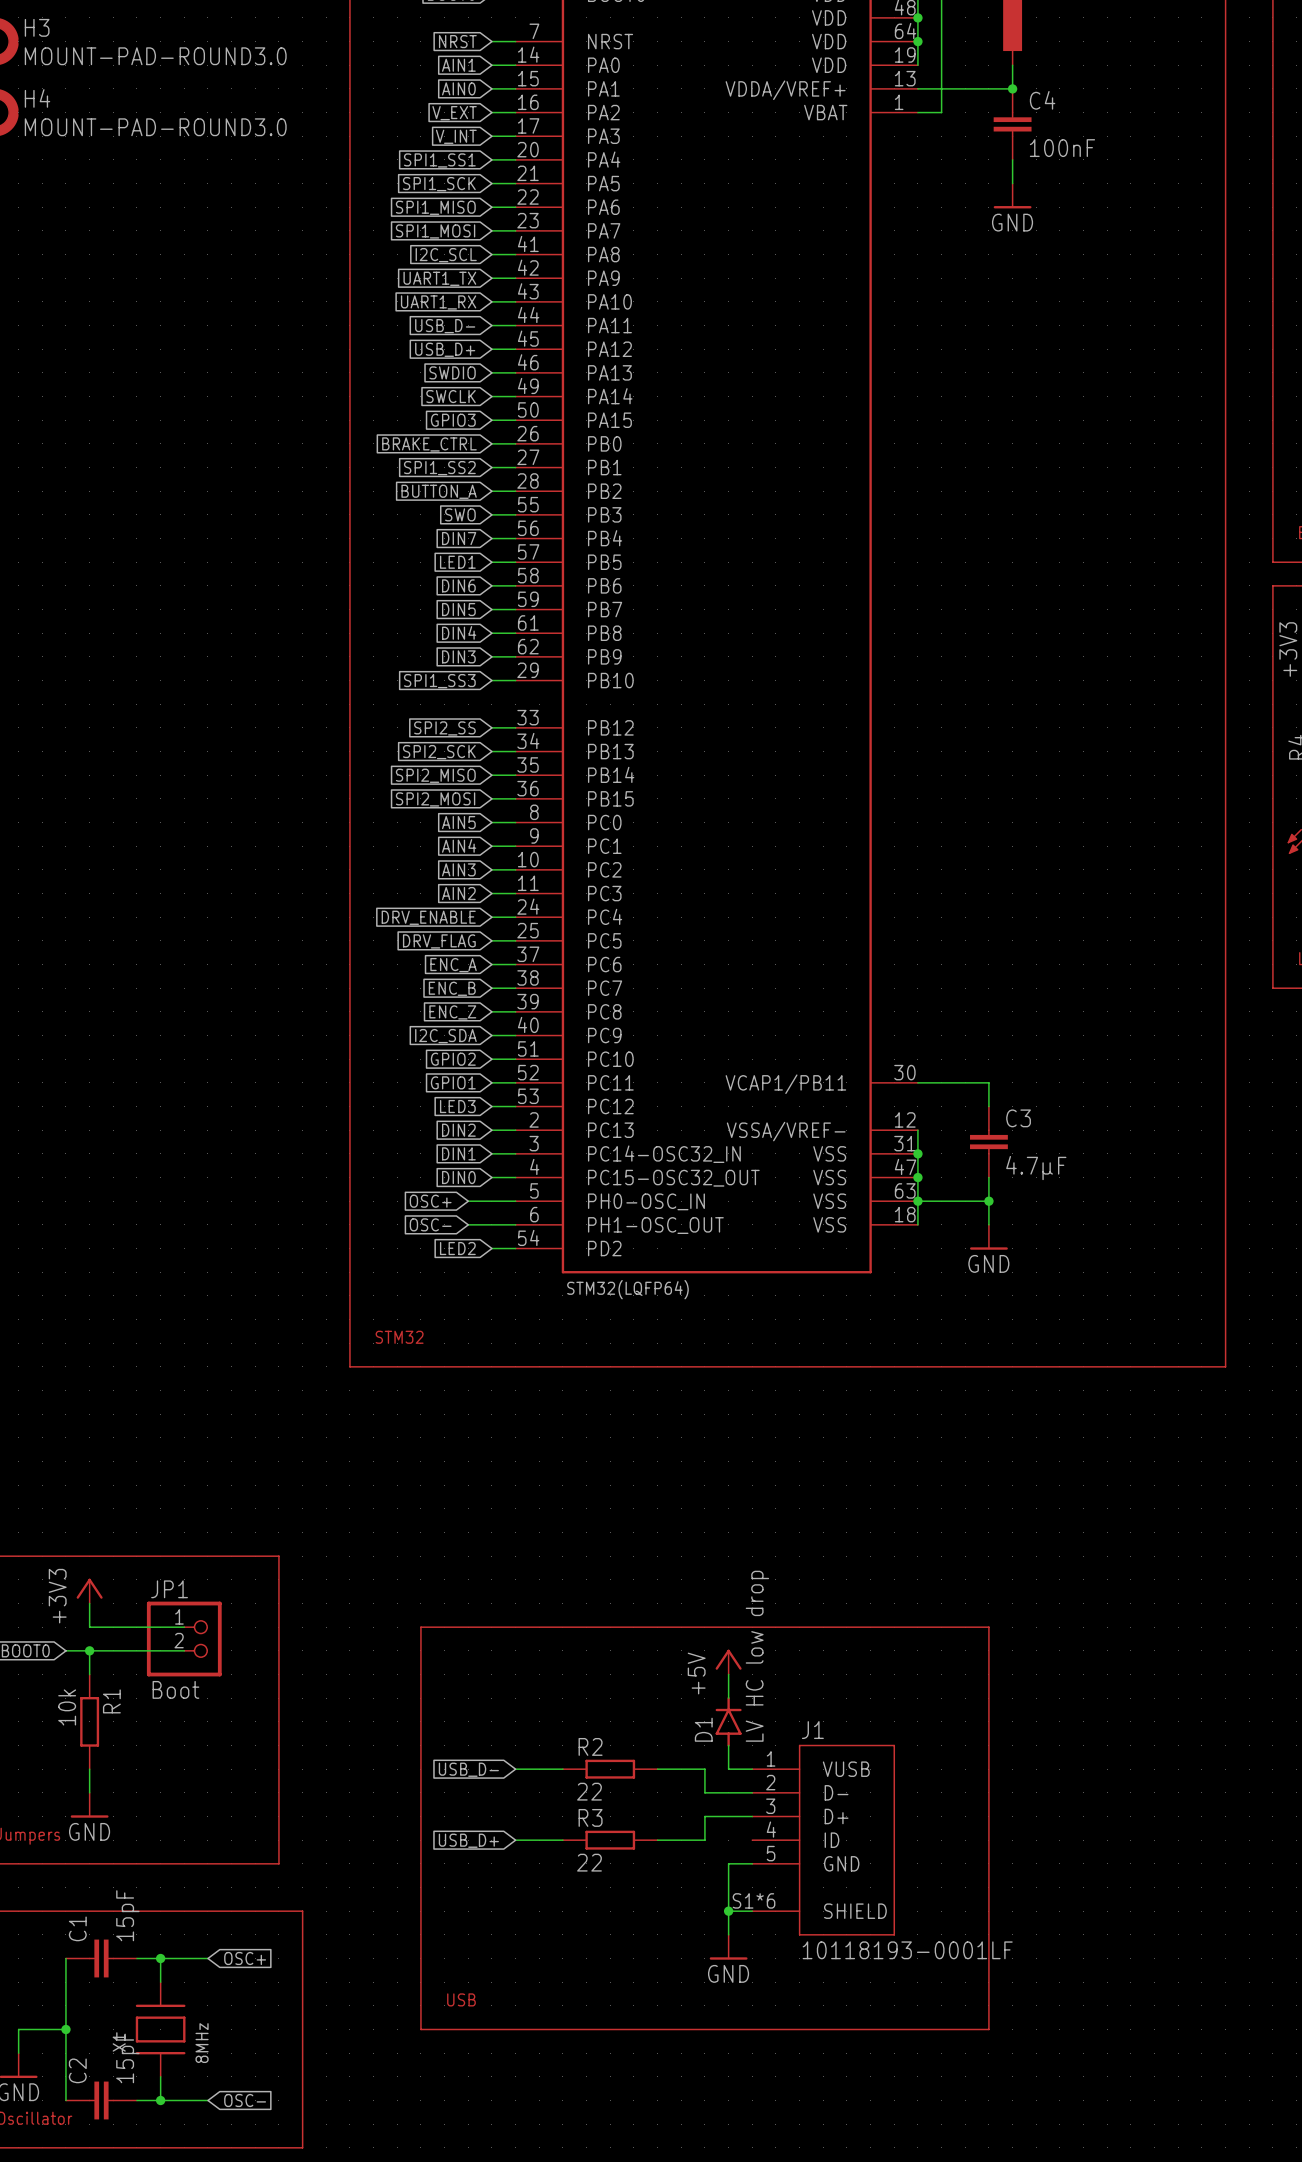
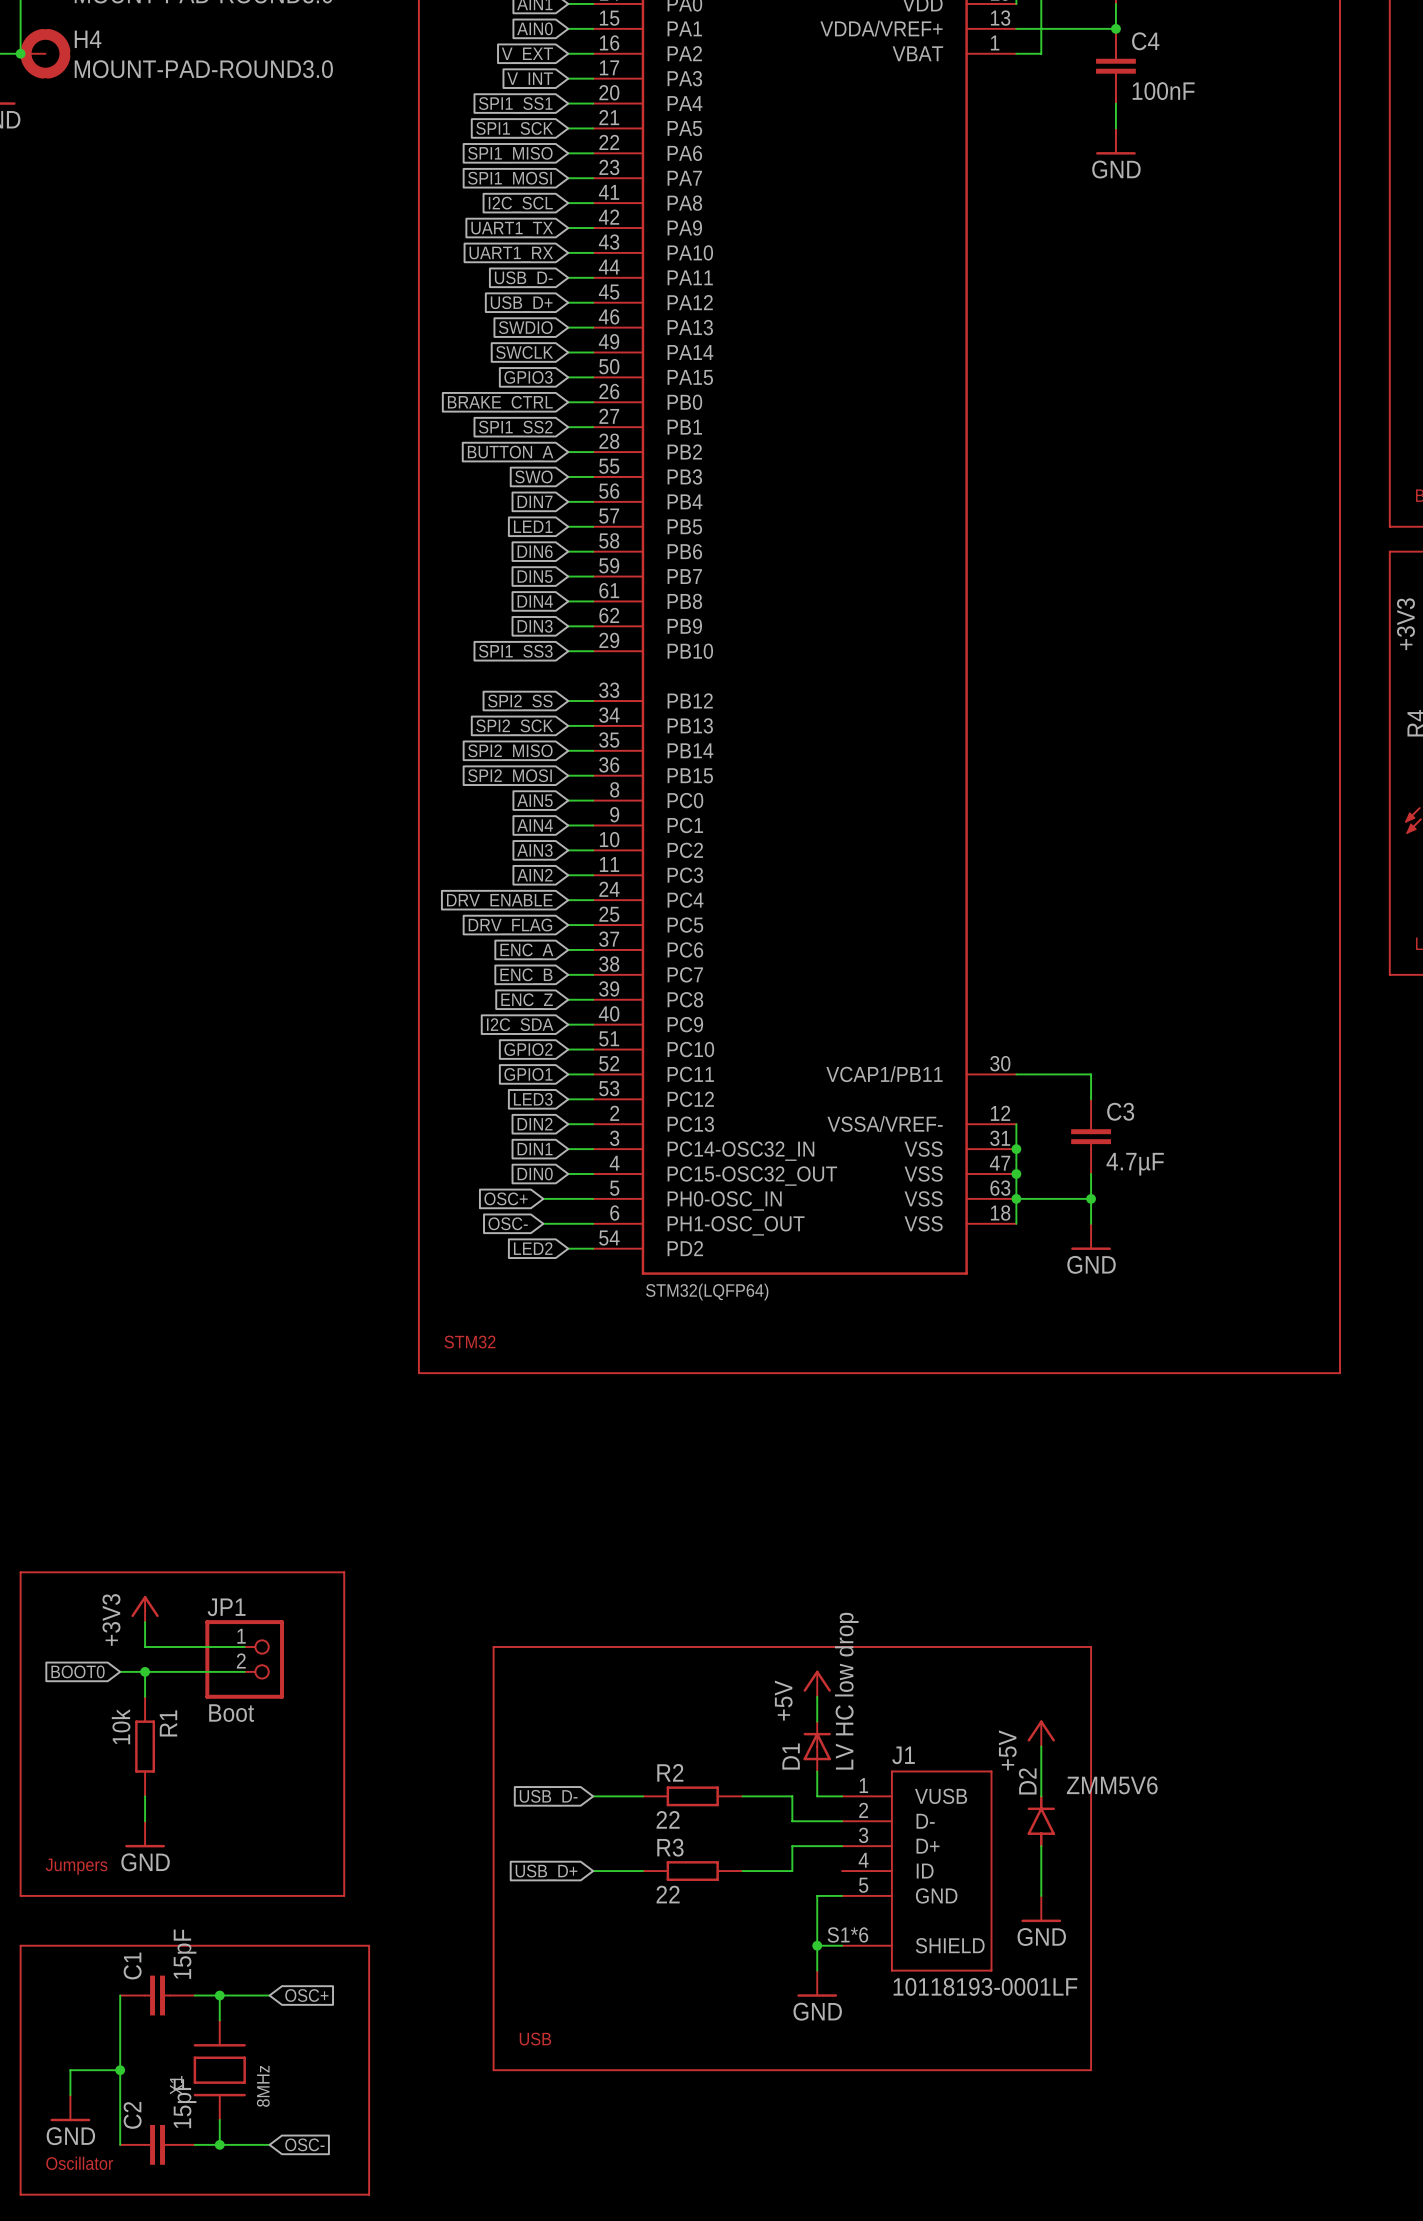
D1 symbol: [715, 1696, 742, 1747] -> [803, 1721, 831, 1772]
power symbol: none -> +5V (1041, 1733)
wire: none -> (1041, 1746) (1041, 1796)
D2: none -> ZMM5V6 (1041, 1821)
wire: none -> (1041, 1846) (1041, 1895)
power symbol: none -> GND (1041, 1909)

